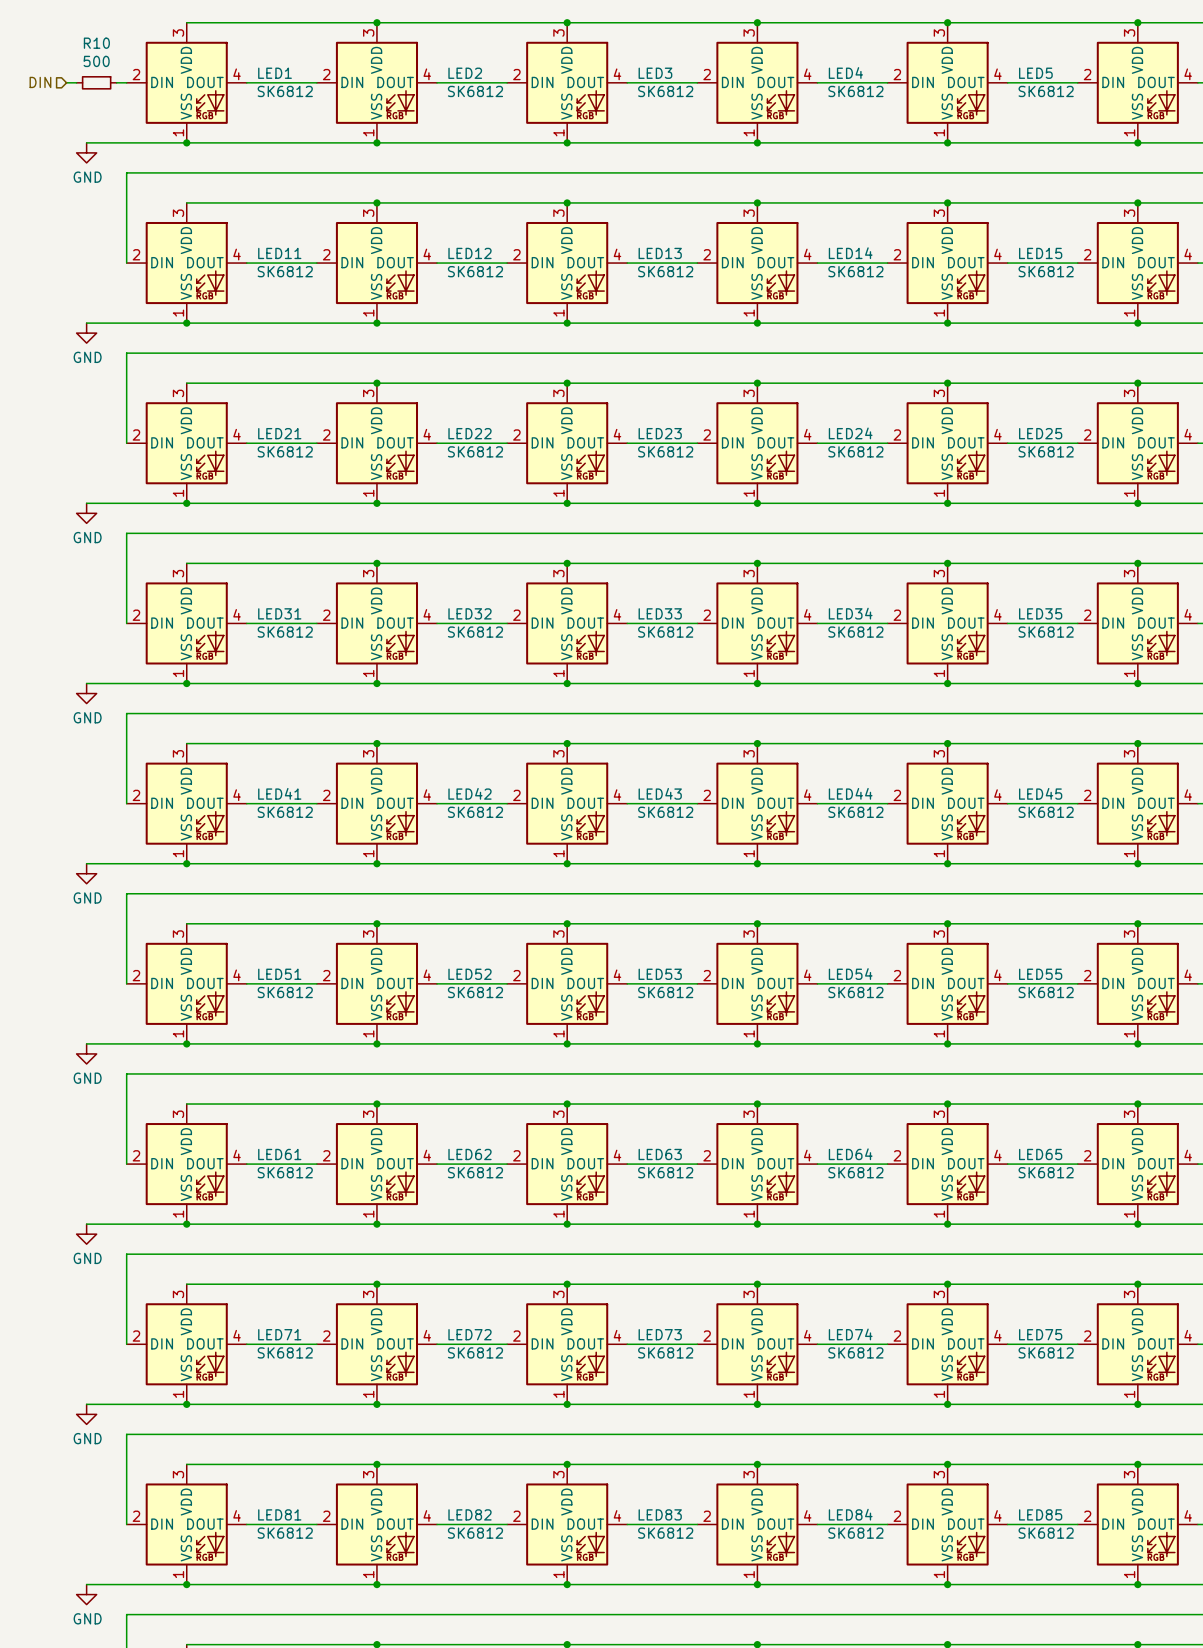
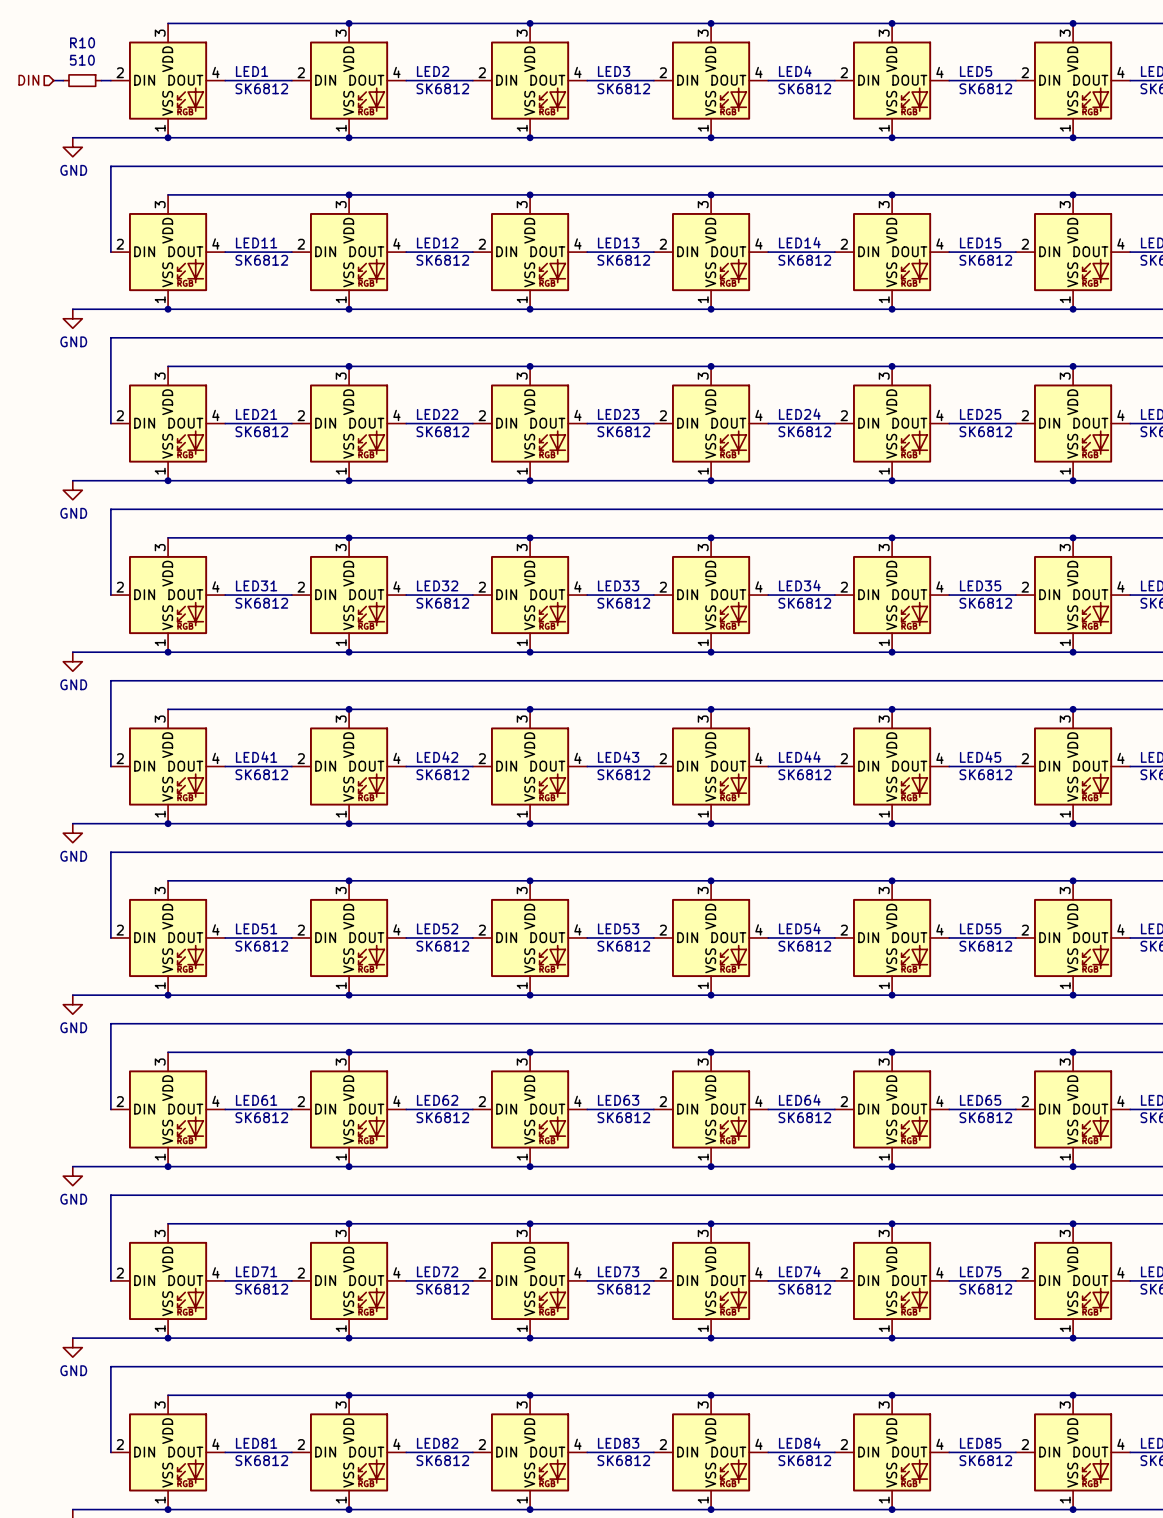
R10 value: 500 (96, 61) -> 510 (82, 60)

